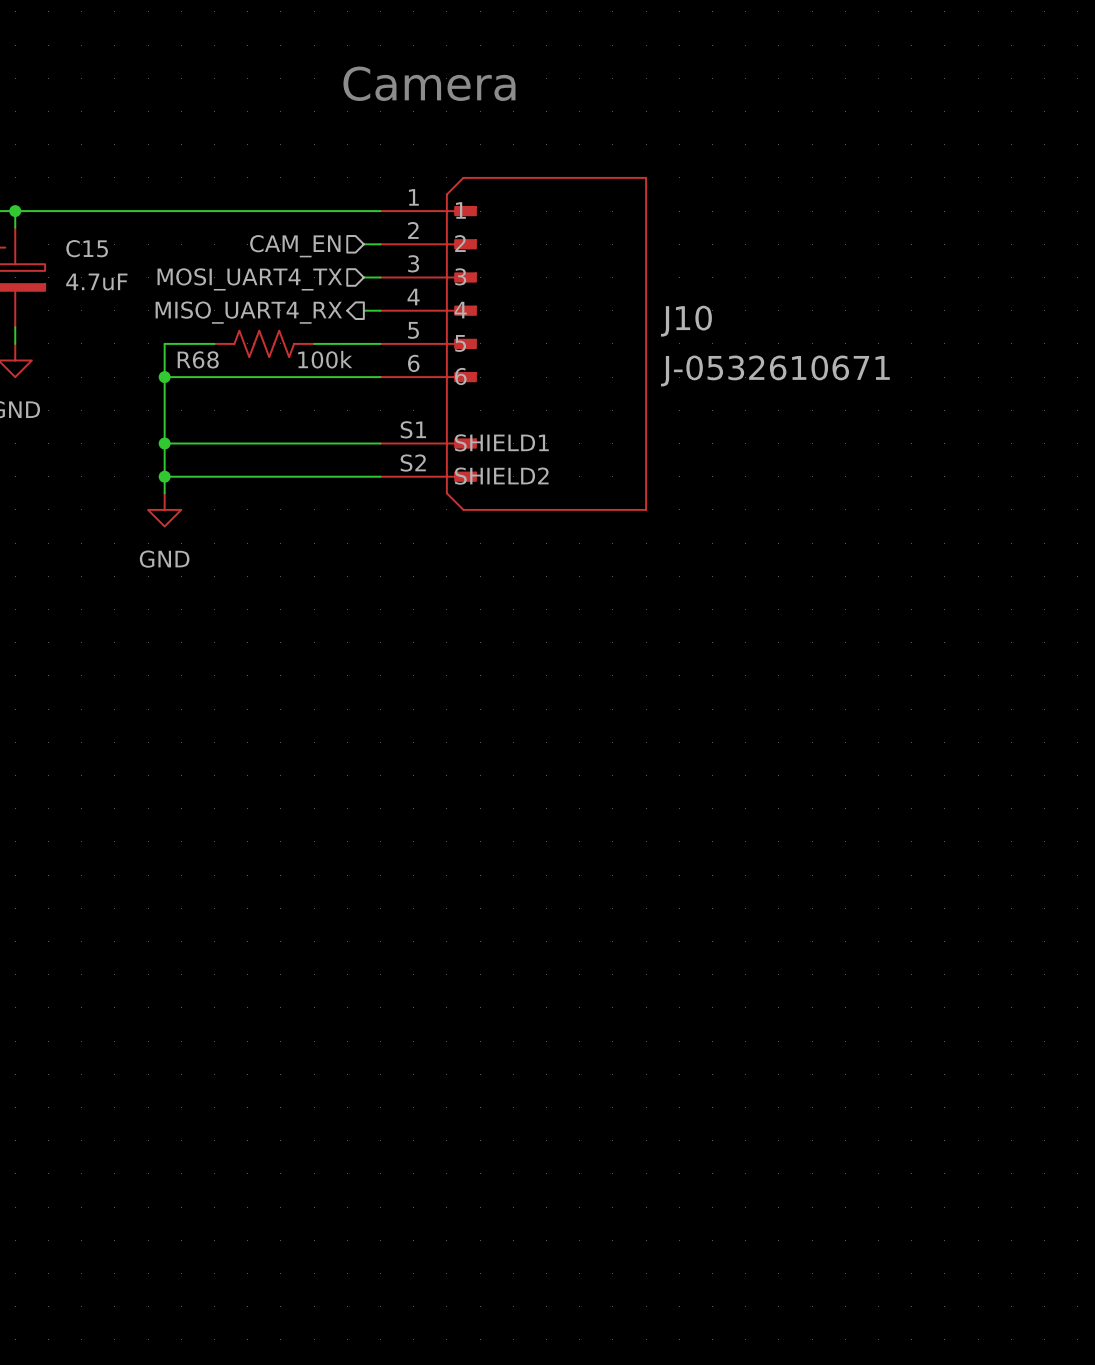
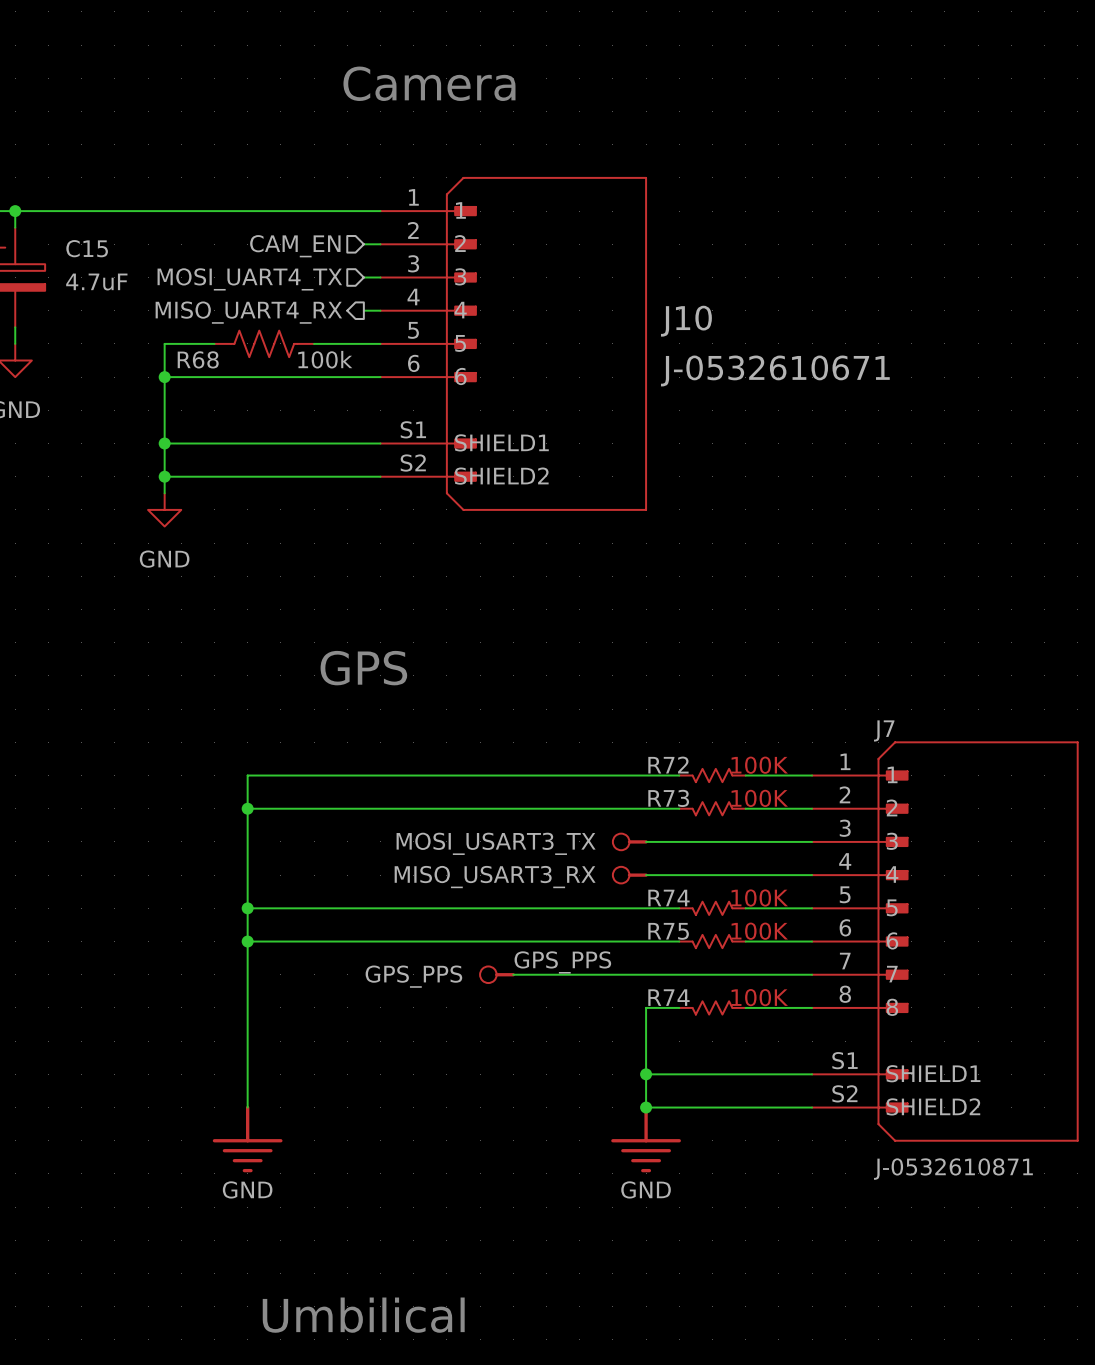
text: none -> GPS (363, 668)
wire: none -> (679, 775) (247, 775) (247, 1107)
R72: none -> (712, 775)
wire: none -> (745, 775) (812, 775)
wire: none -> (247, 808) (679, 808)
junction: none -> (247, 808)
R73: none -> (712, 808)
wire: none -> (745, 808) (812, 808)
power symbol: none -> MOSI_USART3_TX (629, 841)
wire: none -> (646, 841) (812, 841)
power symbol: none -> MISO_USART3_RX (629, 875)
wire: none -> (646, 875) (812, 875)
wire: none -> (247, 908) (679, 908)
junction: none -> (247, 908)
R74: none -> (712, 908)
wire: none -> (745, 908) (812, 908)
wire: none -> (247, 941) (679, 941)
junction: none -> (247, 941)
R75: none -> (712, 941)
wire: none -> (745, 941) (812, 941)
J7: none -> J-0532610871 (944, 941)
label: none -> GPS_PPS (562, 962)
power symbol: none -> GPS_PPS (497, 974)
wire: none -> (513, 974) (812, 974)
wire: none -> (679, 1007) (646, 1007) (646, 1107) (812, 1107)
R74: none -> (712, 1007)
wire: none -> (745, 1007) (812, 1007)
wire: none -> (646, 1074) (812, 1074)
junction: none -> (646, 1074)
junction: none -> (646, 1107)
power symbol: none -> GND (247, 1139)
power symbol: none -> GND (646, 1139)
text: none -> Umbilical (363, 1315)

